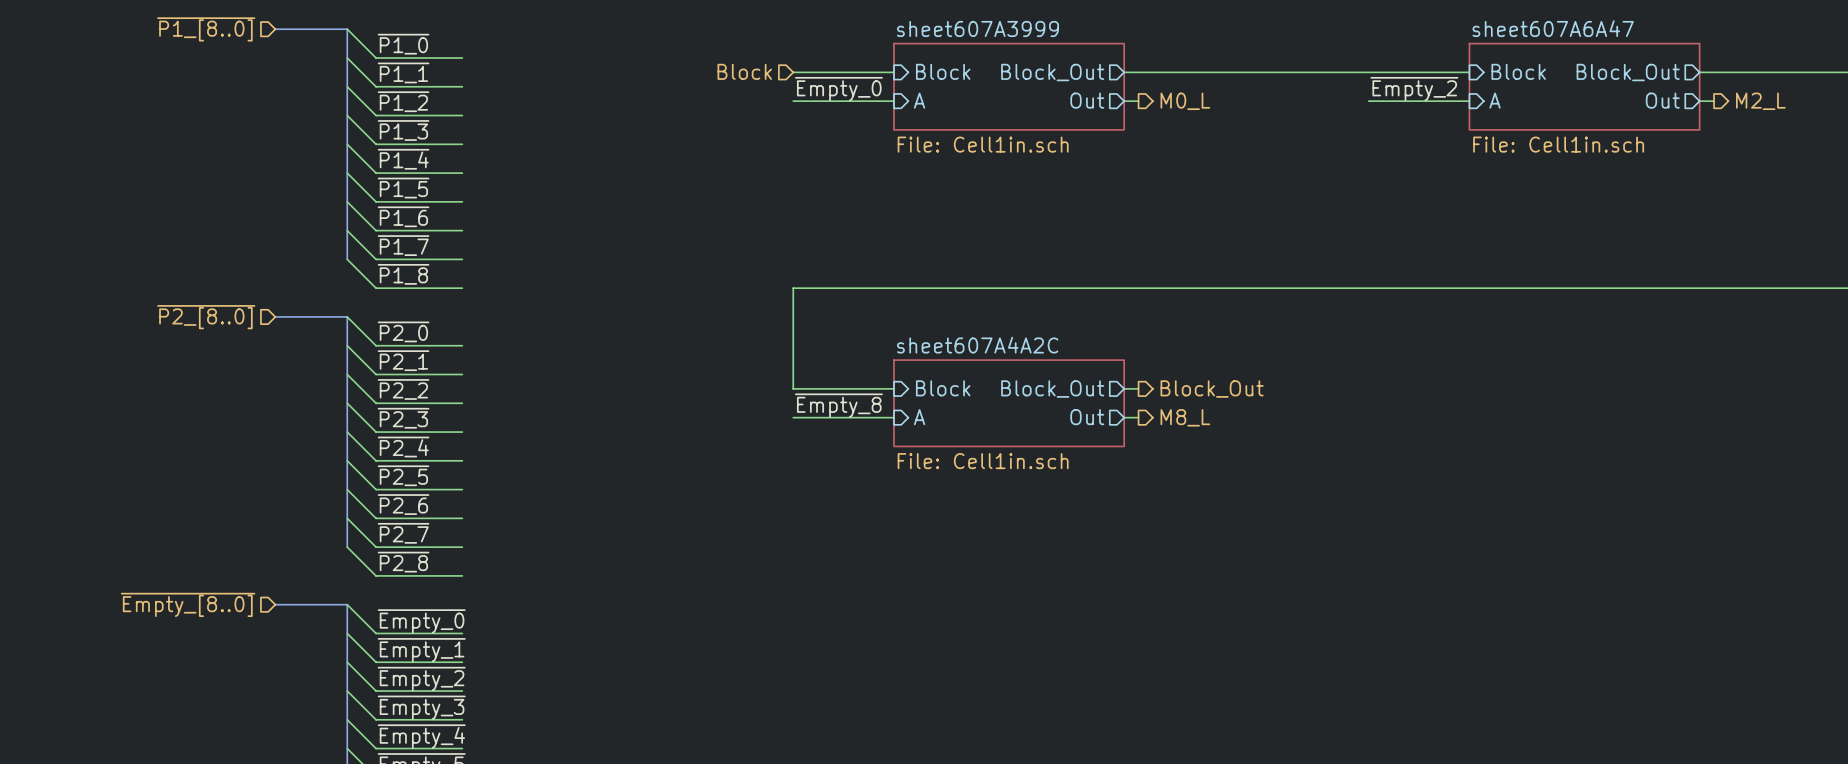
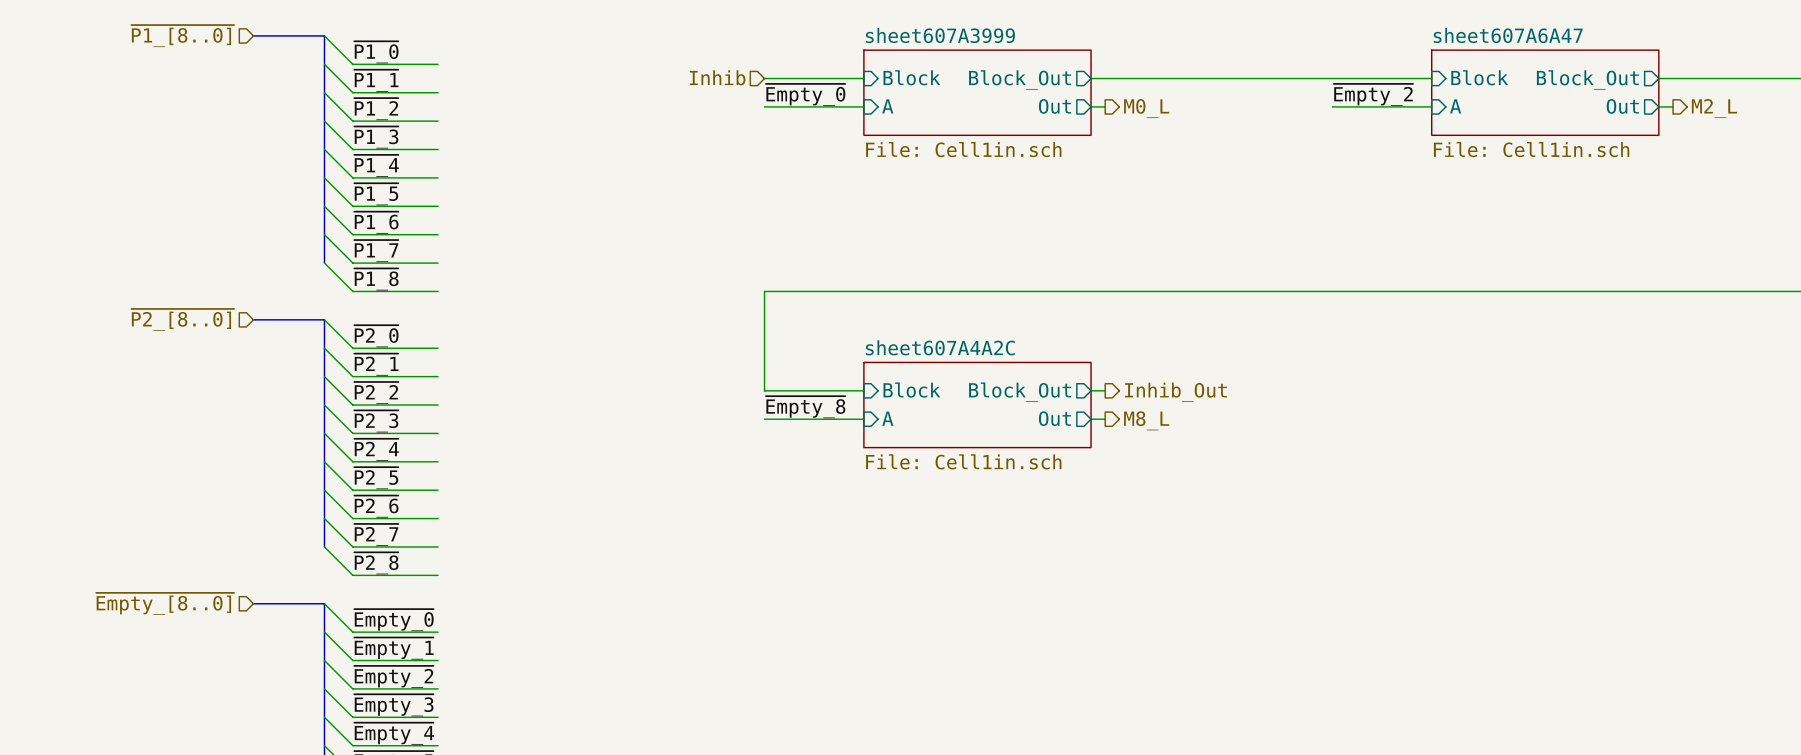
hierarchical label: Block (744, 71) -> Inhib (717, 77)
hierarchical label: Block_Out (1212, 389) -> Inhib_Out (1176, 392)

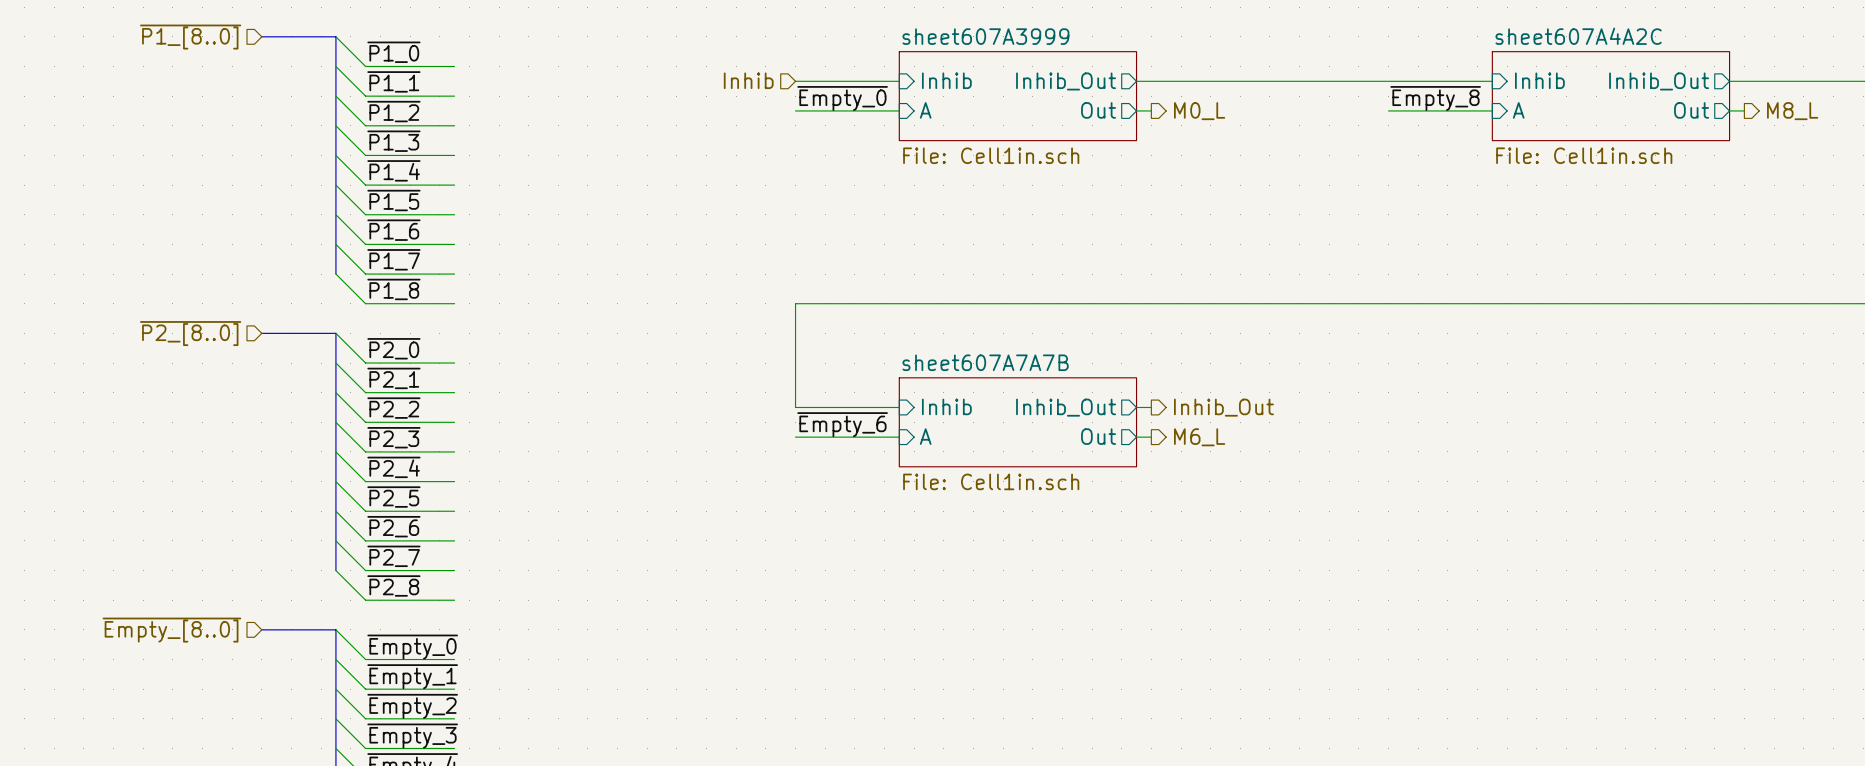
sheet sheet607A6A47 name: sheet607A6A47 (1508, 35) -> sheet607A4A2C (1578, 36)
sheet pin: Block (911, 77) -> Inhib (946, 80)
sheet pin: Block (1479, 77) -> Inhib (1539, 80)
sheet pin: Block_Out (1020, 79) -> Inhib_Out (1066, 81)
sheet pin: Block_Out (1587, 79) -> Inhib_Out (1659, 81)
label: ~{Empty_2} (1373, 94) -> ~{Empty_8} (1435, 98)
hierarchical label: M2_L (1714, 108) -> M8_L (1792, 111)
sheet sheet607A4A2C name: sheet607A4A2C (940, 347) -> sheet607A7A7B (985, 362)
sheet pin: Block (911, 390) -> Inhib (946, 406)
sheet pin: Block_Out (1020, 392) -> Inhib_Out (1066, 407)
label: ~{Empty_8} (805, 407) -> ~{Empty_6} (842, 424)
hierarchical label: M8_L (1146, 420) -> M6_L (1199, 437)

